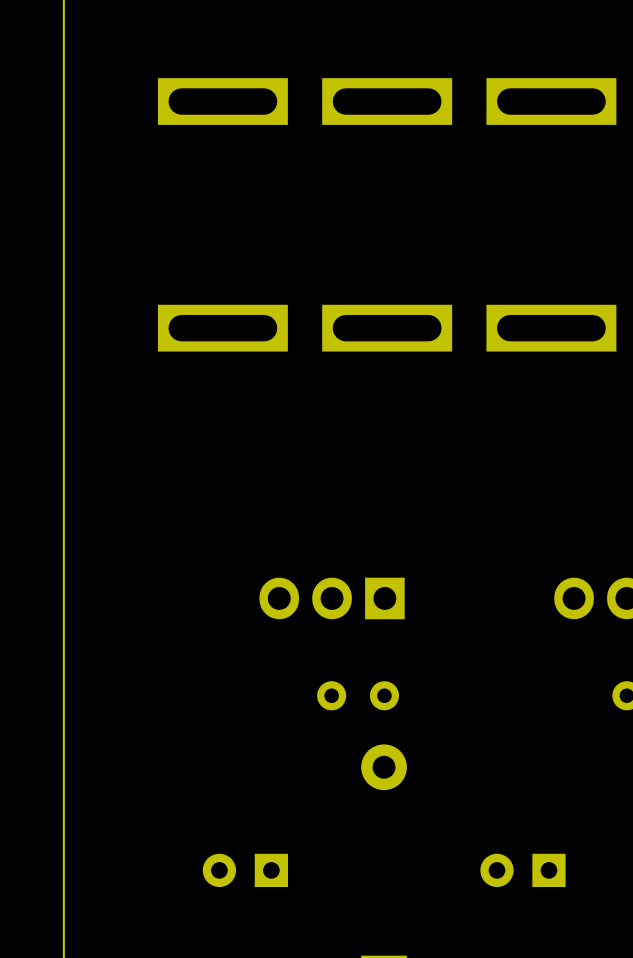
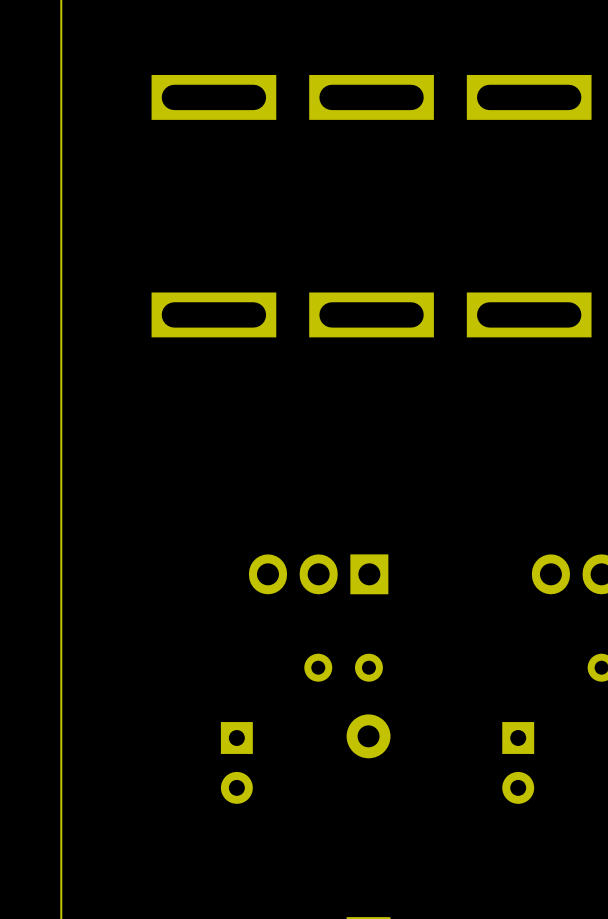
part rotation: 0° (245, 870) -> 90° counterclockwise (236, 762)
part position: (245, 870) -> (236, 762)
part rotation: 0° (522, 870) -> 90° counterclockwise (518, 762)
part position: (522, 870) -> (518, 762)

